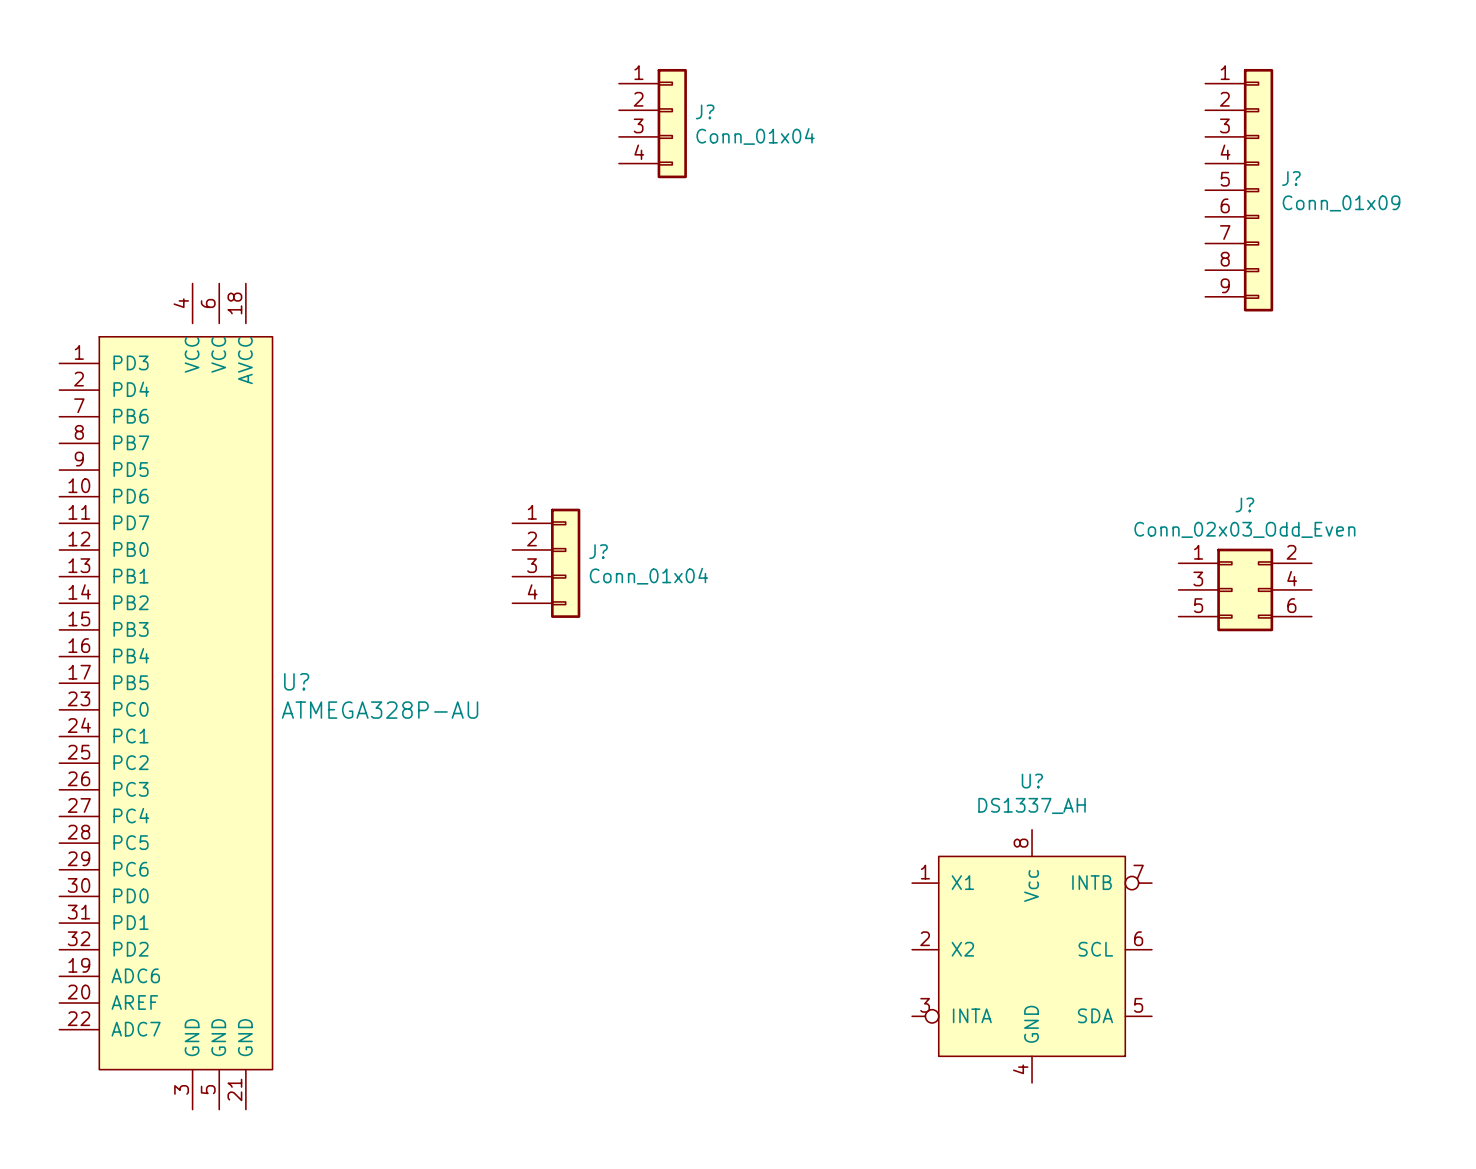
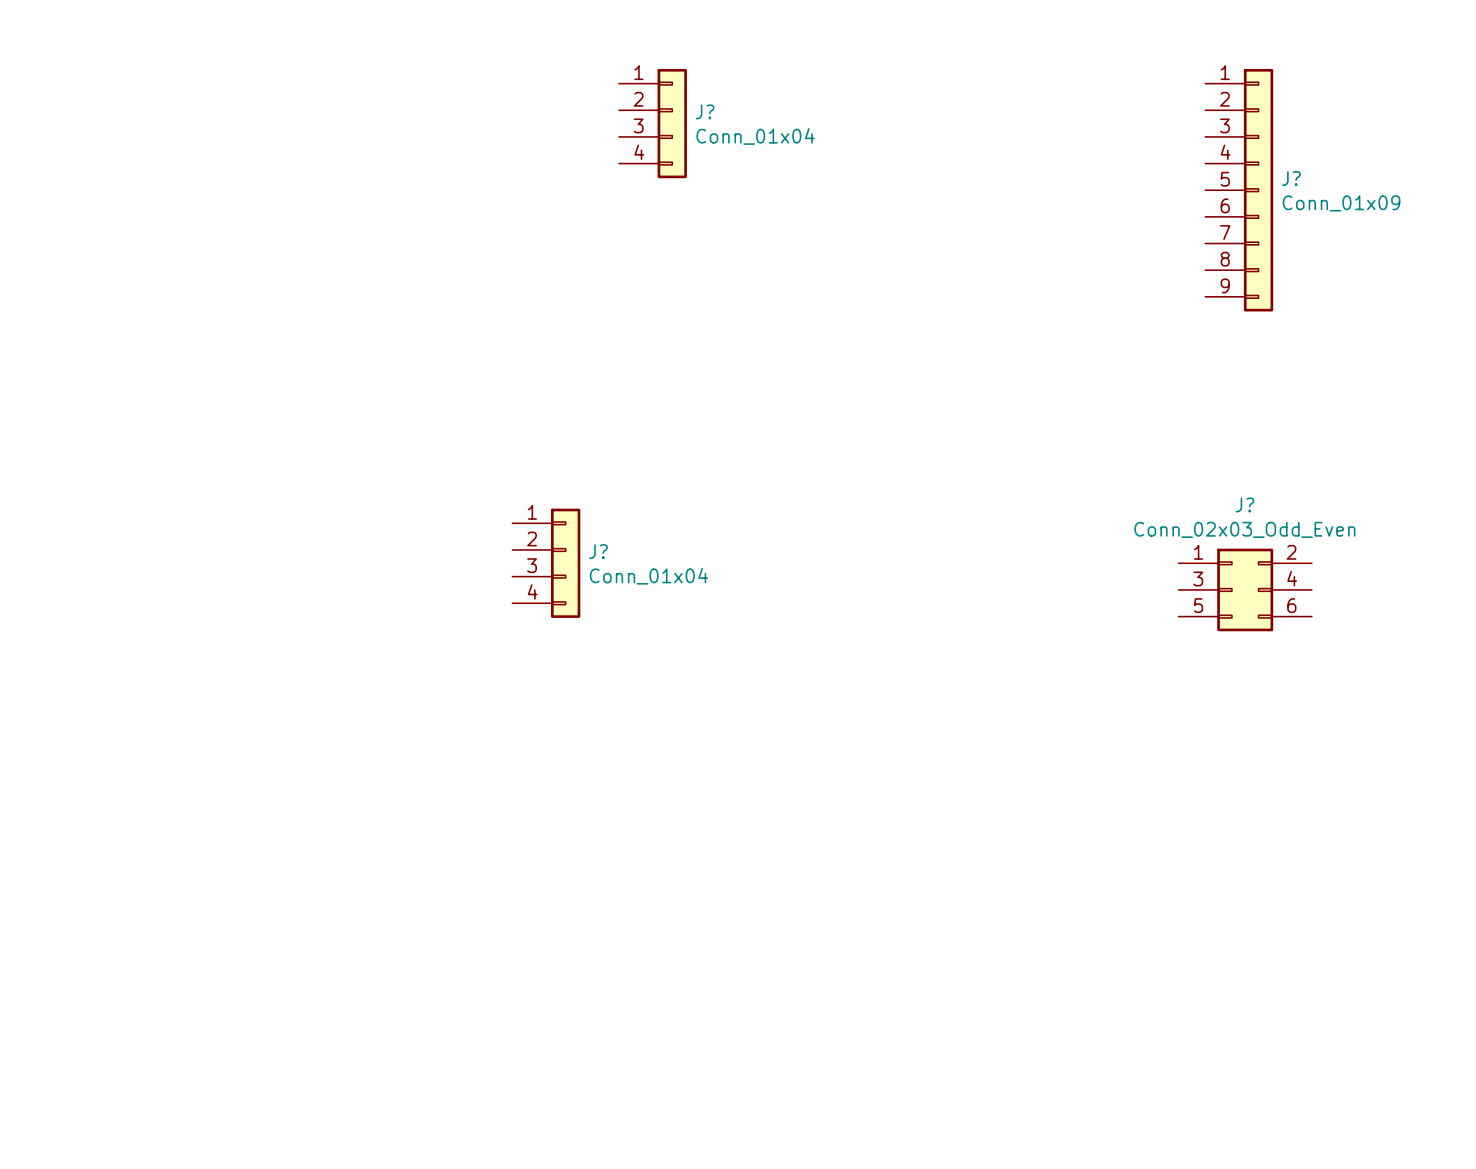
U?: ATMEGA328P-AU (165, 696) -> none
U?: DS1337_AH (1032, 956) -> none

